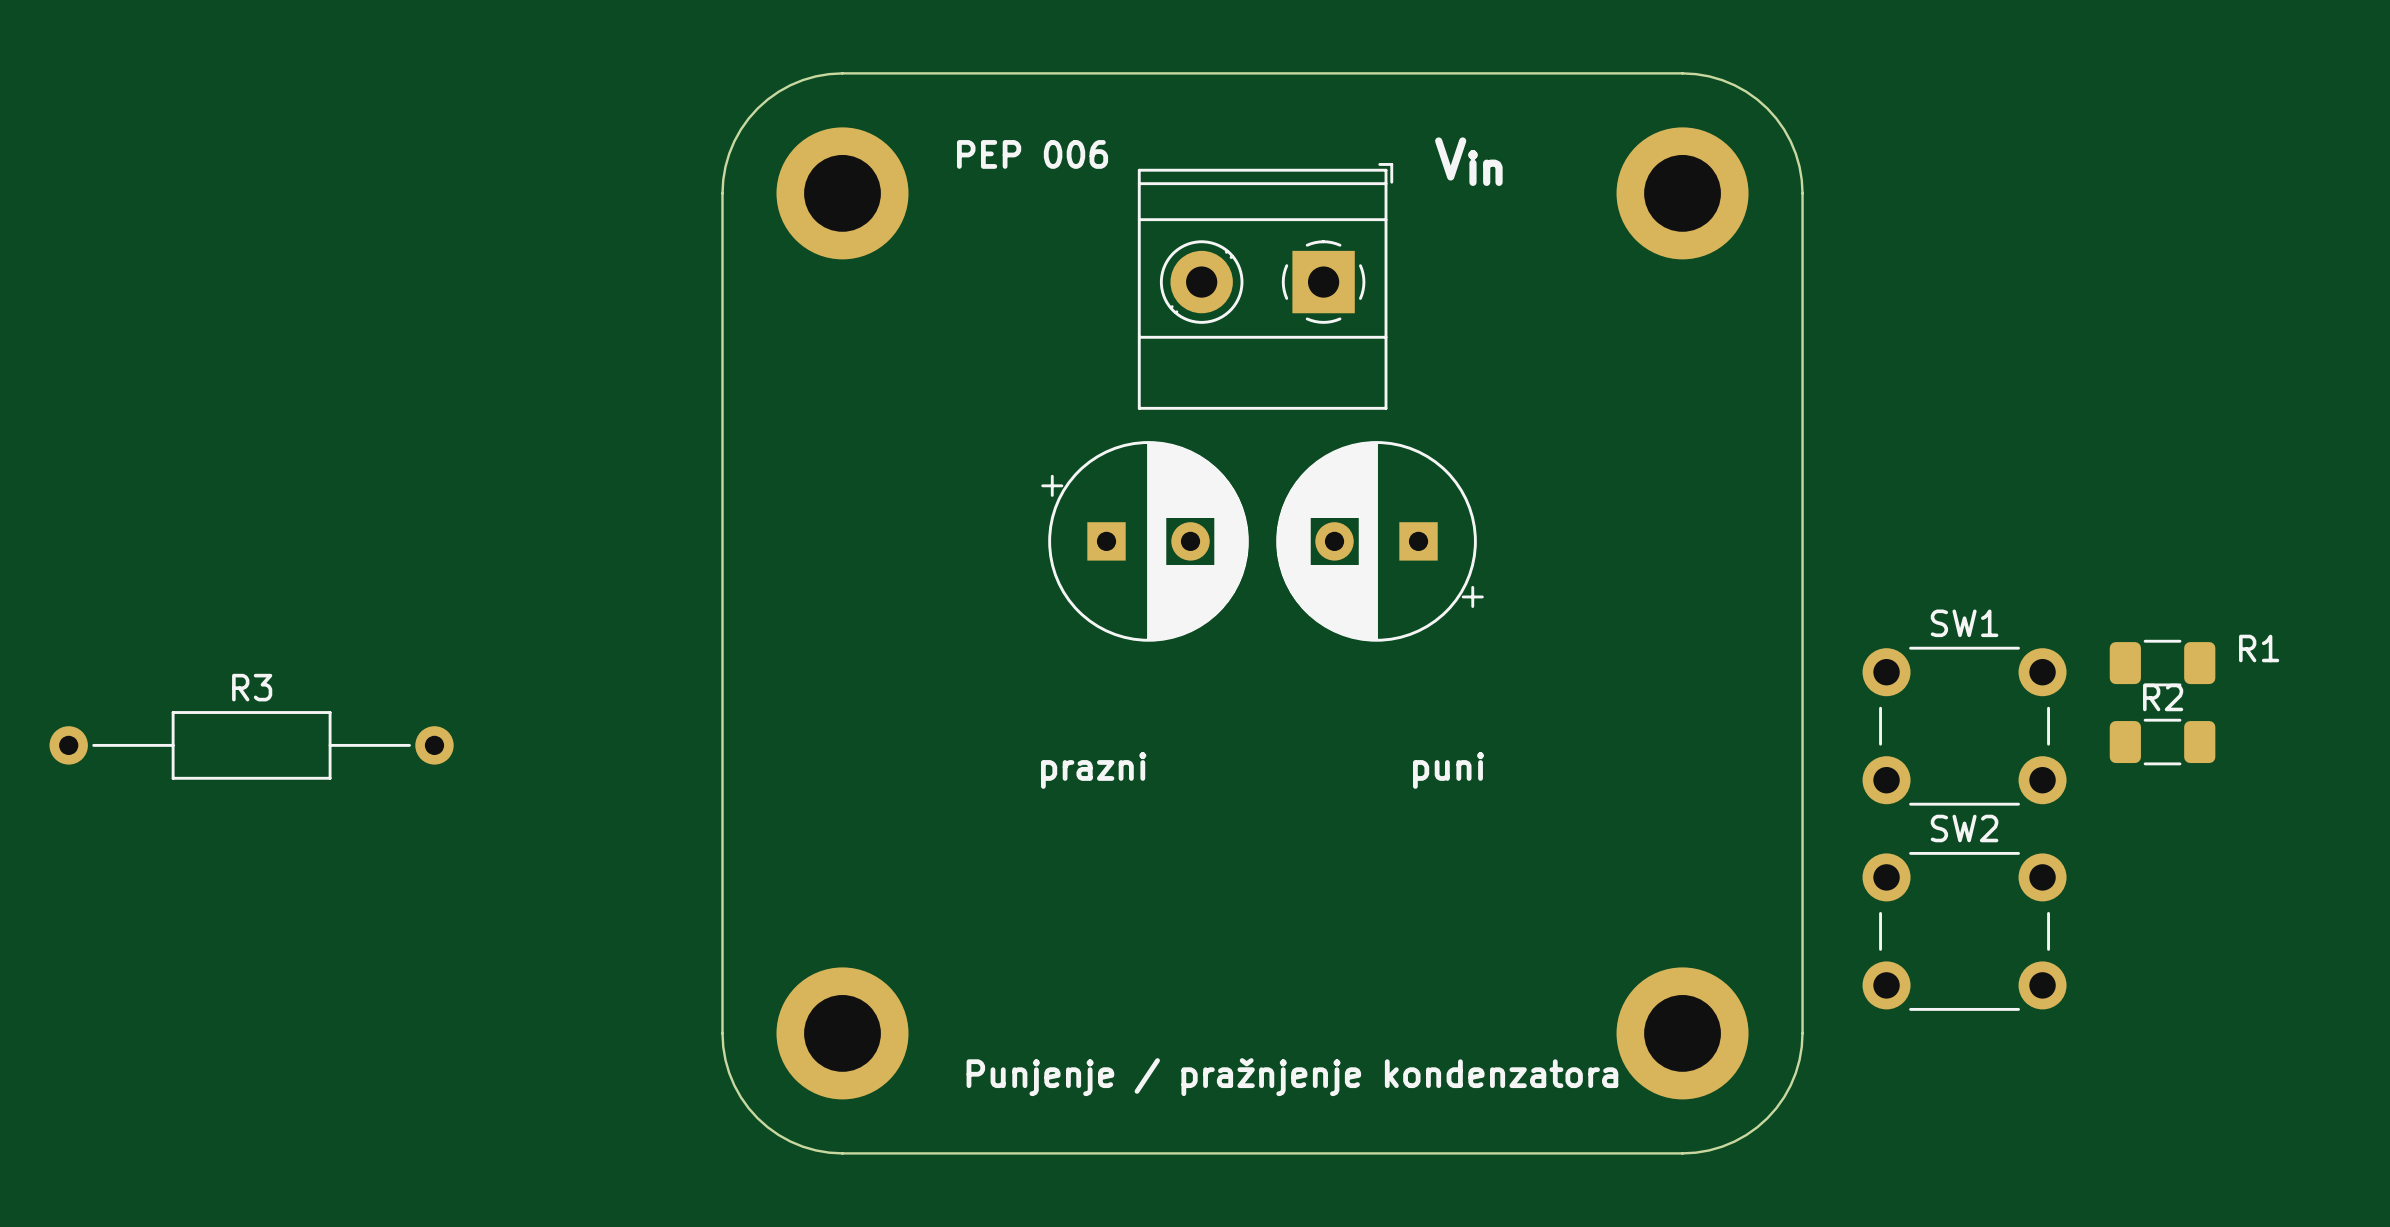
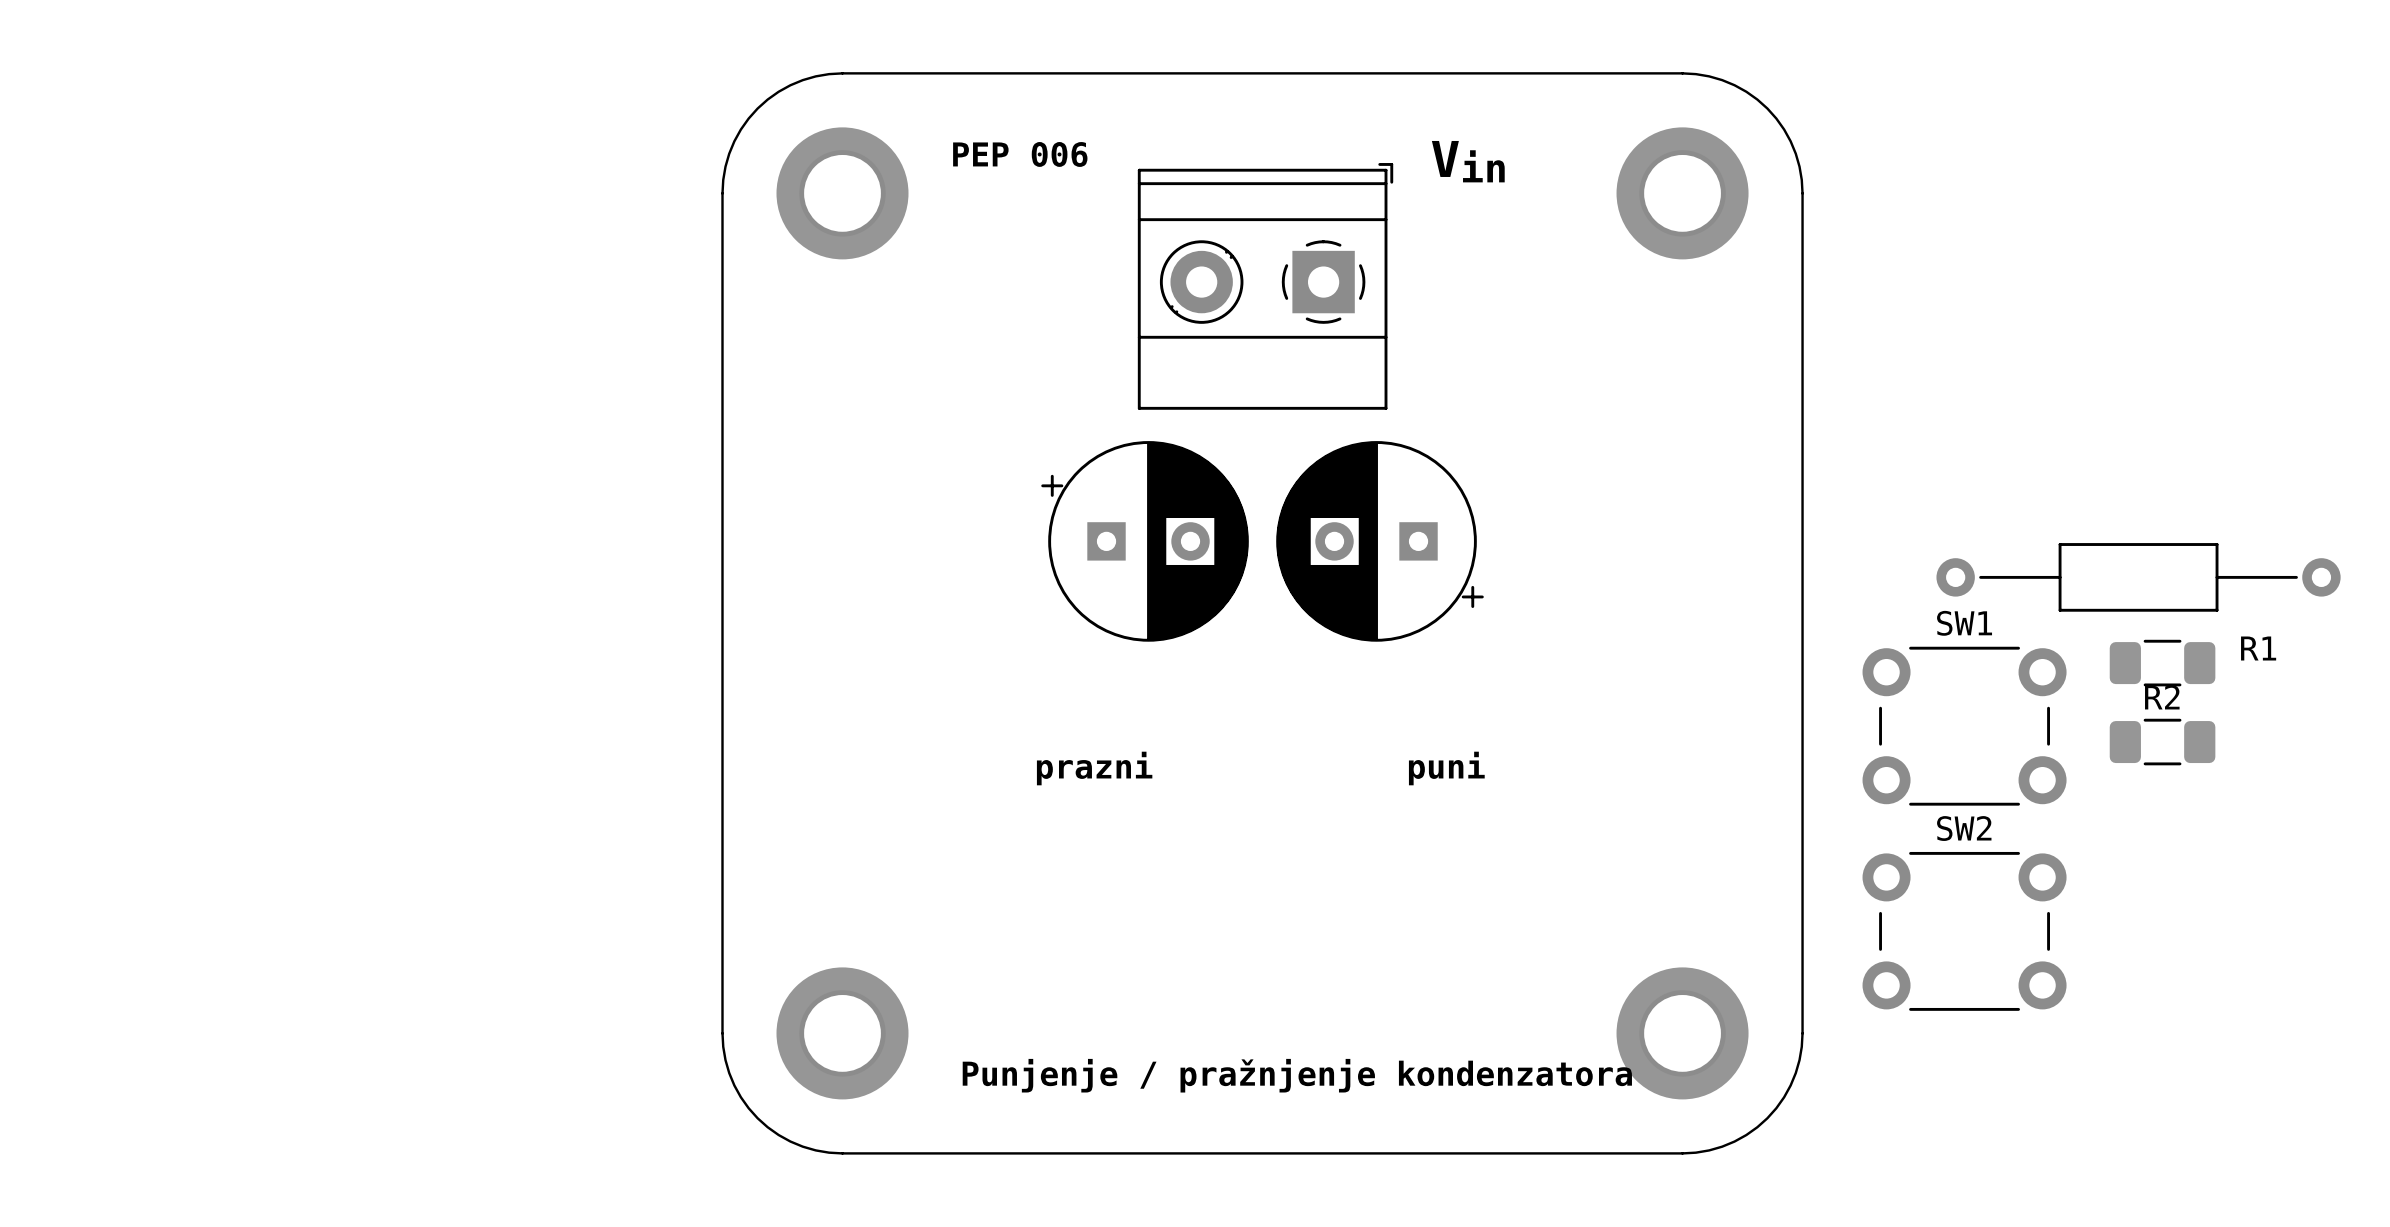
part: none -> (2138, 577)
R3: (251, 745) -> none

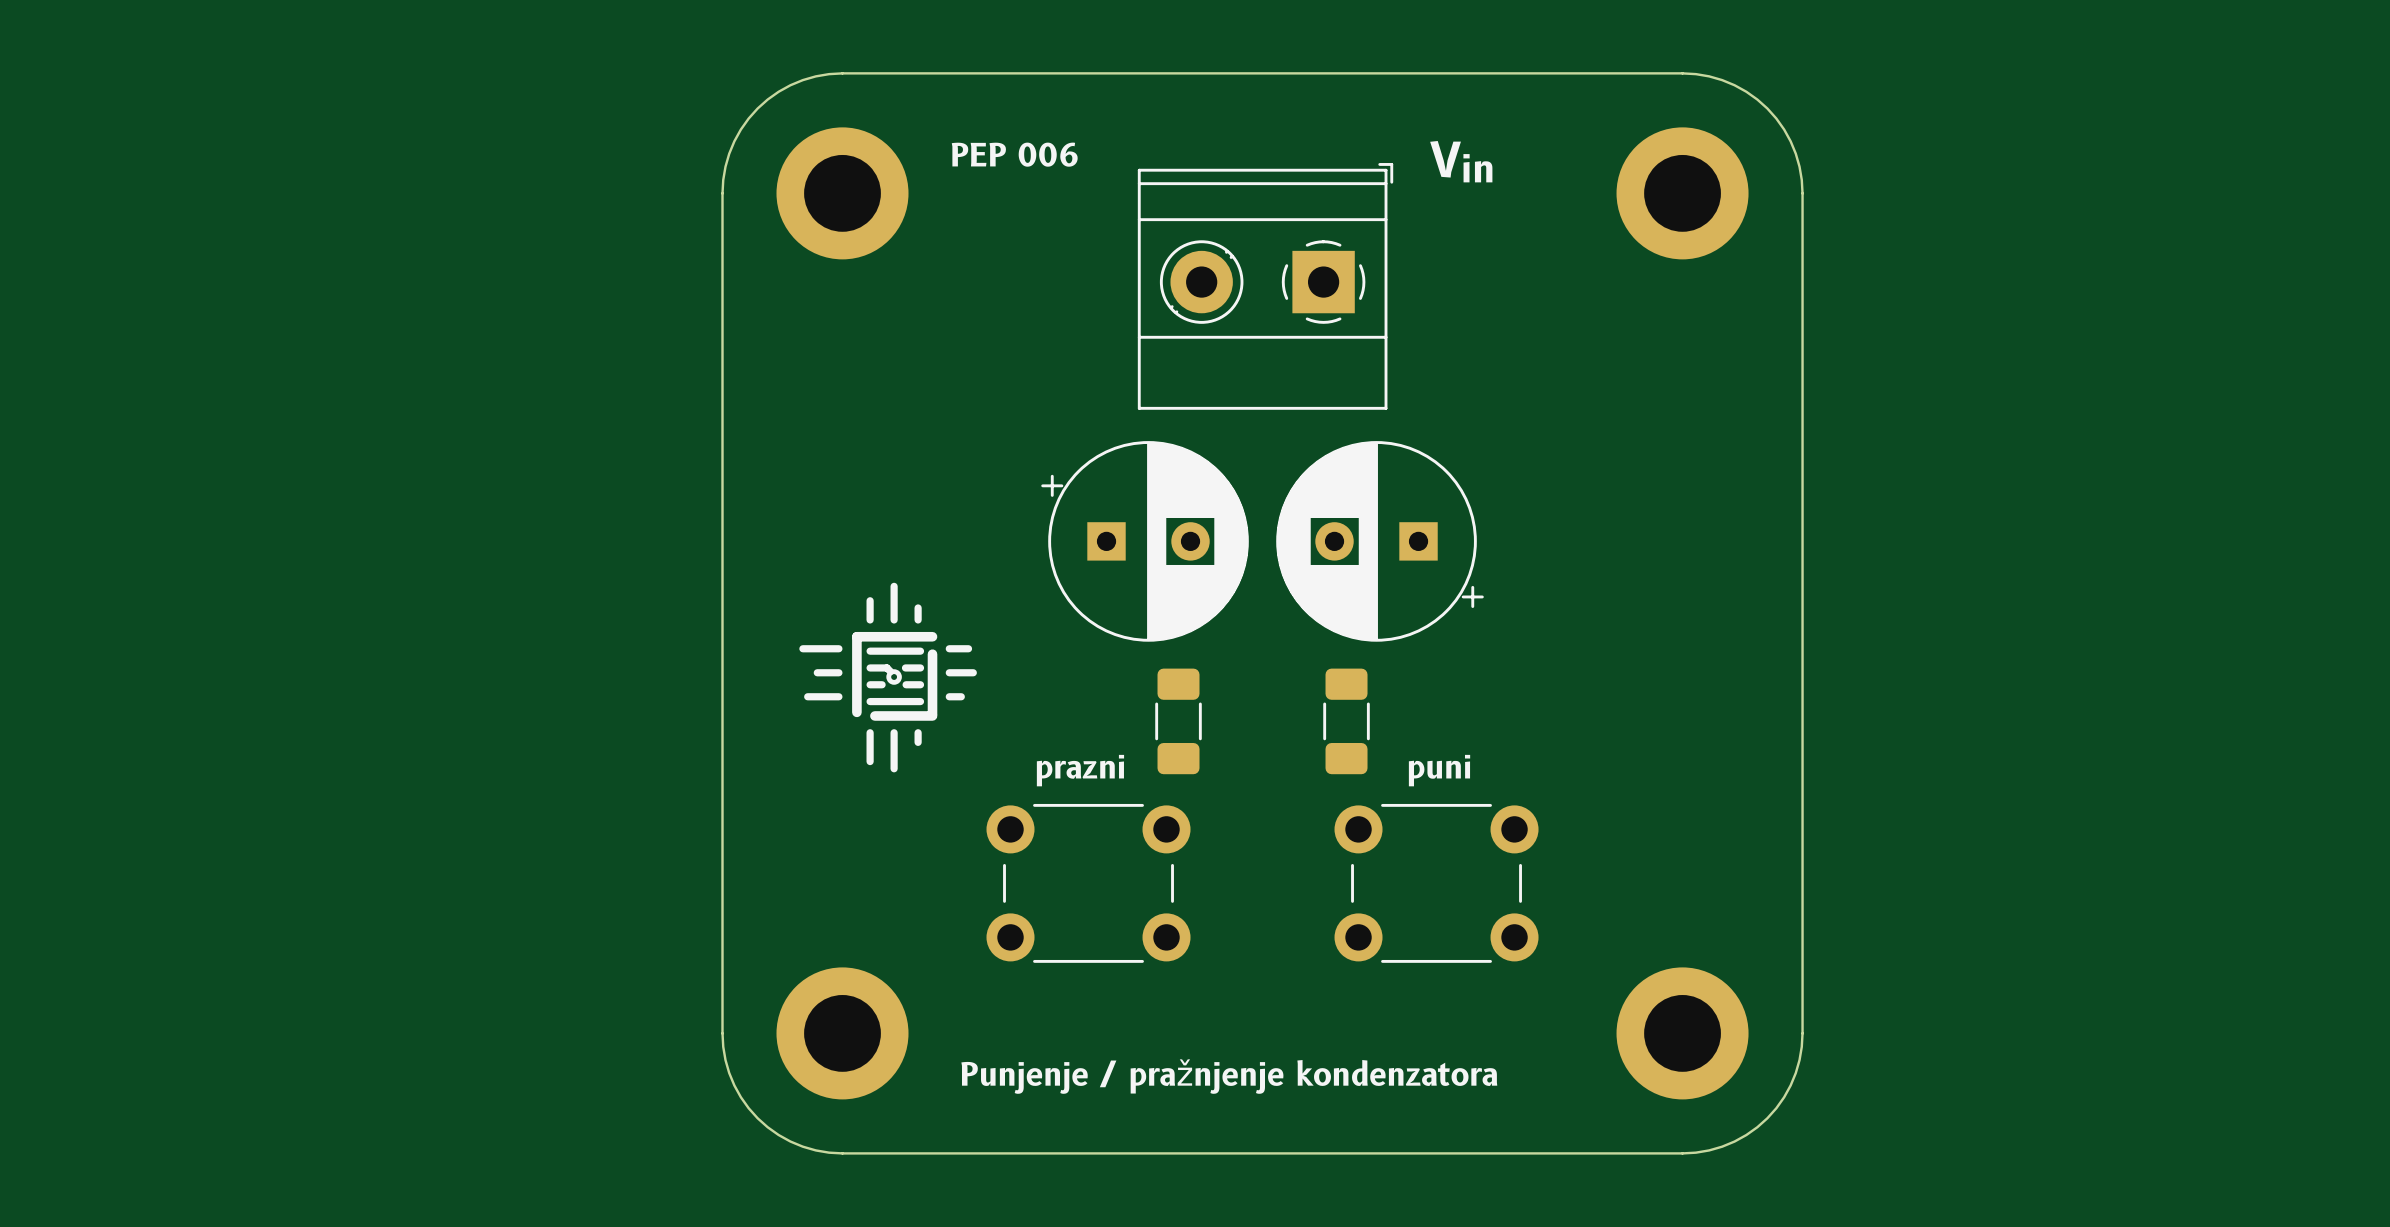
part: (2138, 577) -> none
drawing: none -> [799, 582, 977, 773]
R1: (2162, 663) -> none
part: none -> (1178, 721)
part: none -> (1346, 721)
SW1: (1964, 726) -> none
R2: (2162, 742) -> none
part: none -> (1088, 883)
part: none -> (1436, 883)
SW2: (1964, 931) -> none

